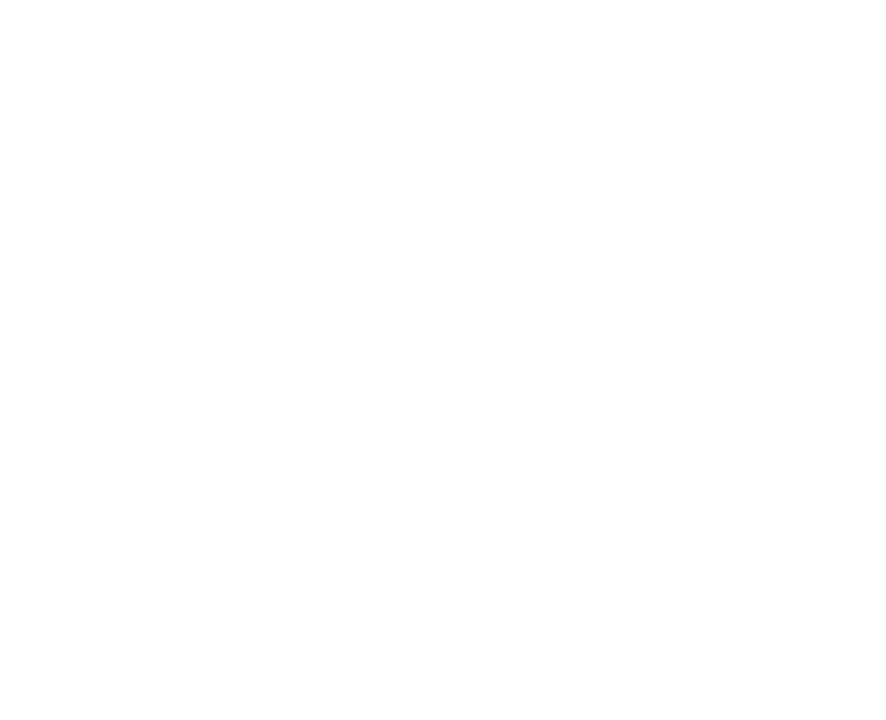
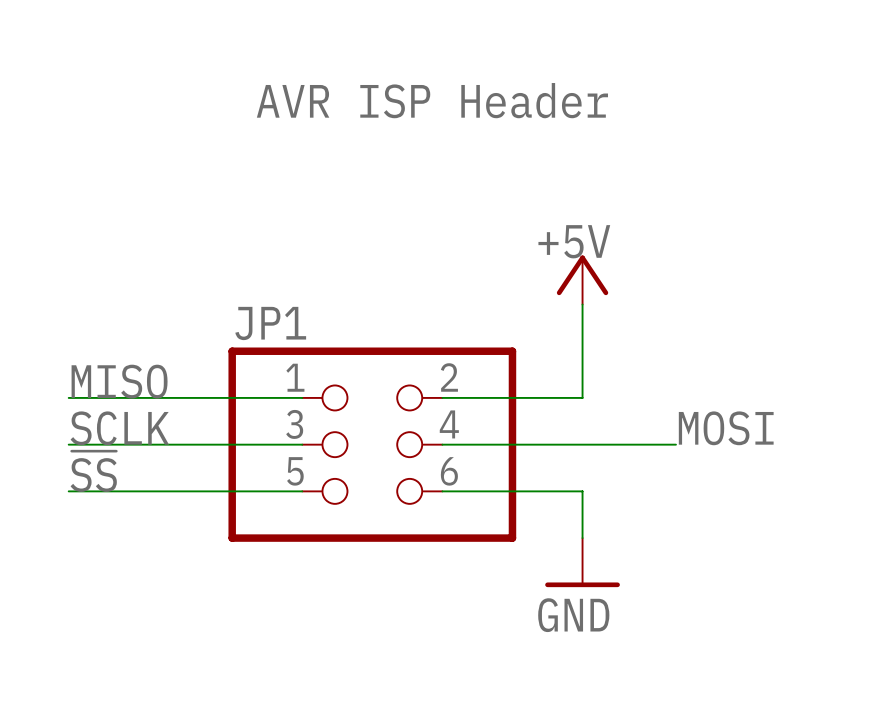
text: none -> AVR ISP Header (432, 100)
power symbol: none -> +5V (582, 280)
wire: none -> (582, 304) (582, 397) (442, 397)
label: none -> MISO (119, 381)
wire: none -> (68, 397) (302, 397)
label: none -> SCLK (119, 428)
label: none -> MOSI (726, 428)
wire: none -> (68, 444) (302, 444)
JP1: none -> (372, 444)
wire: none -> (442, 444) (675, 444)
label: none -> ~{SS} (93, 471)
wire: none -> (68, 491) (302, 491)
wire: none -> (442, 491) (582, 491) (582, 538)
power symbol: none -> GND (582, 562)

